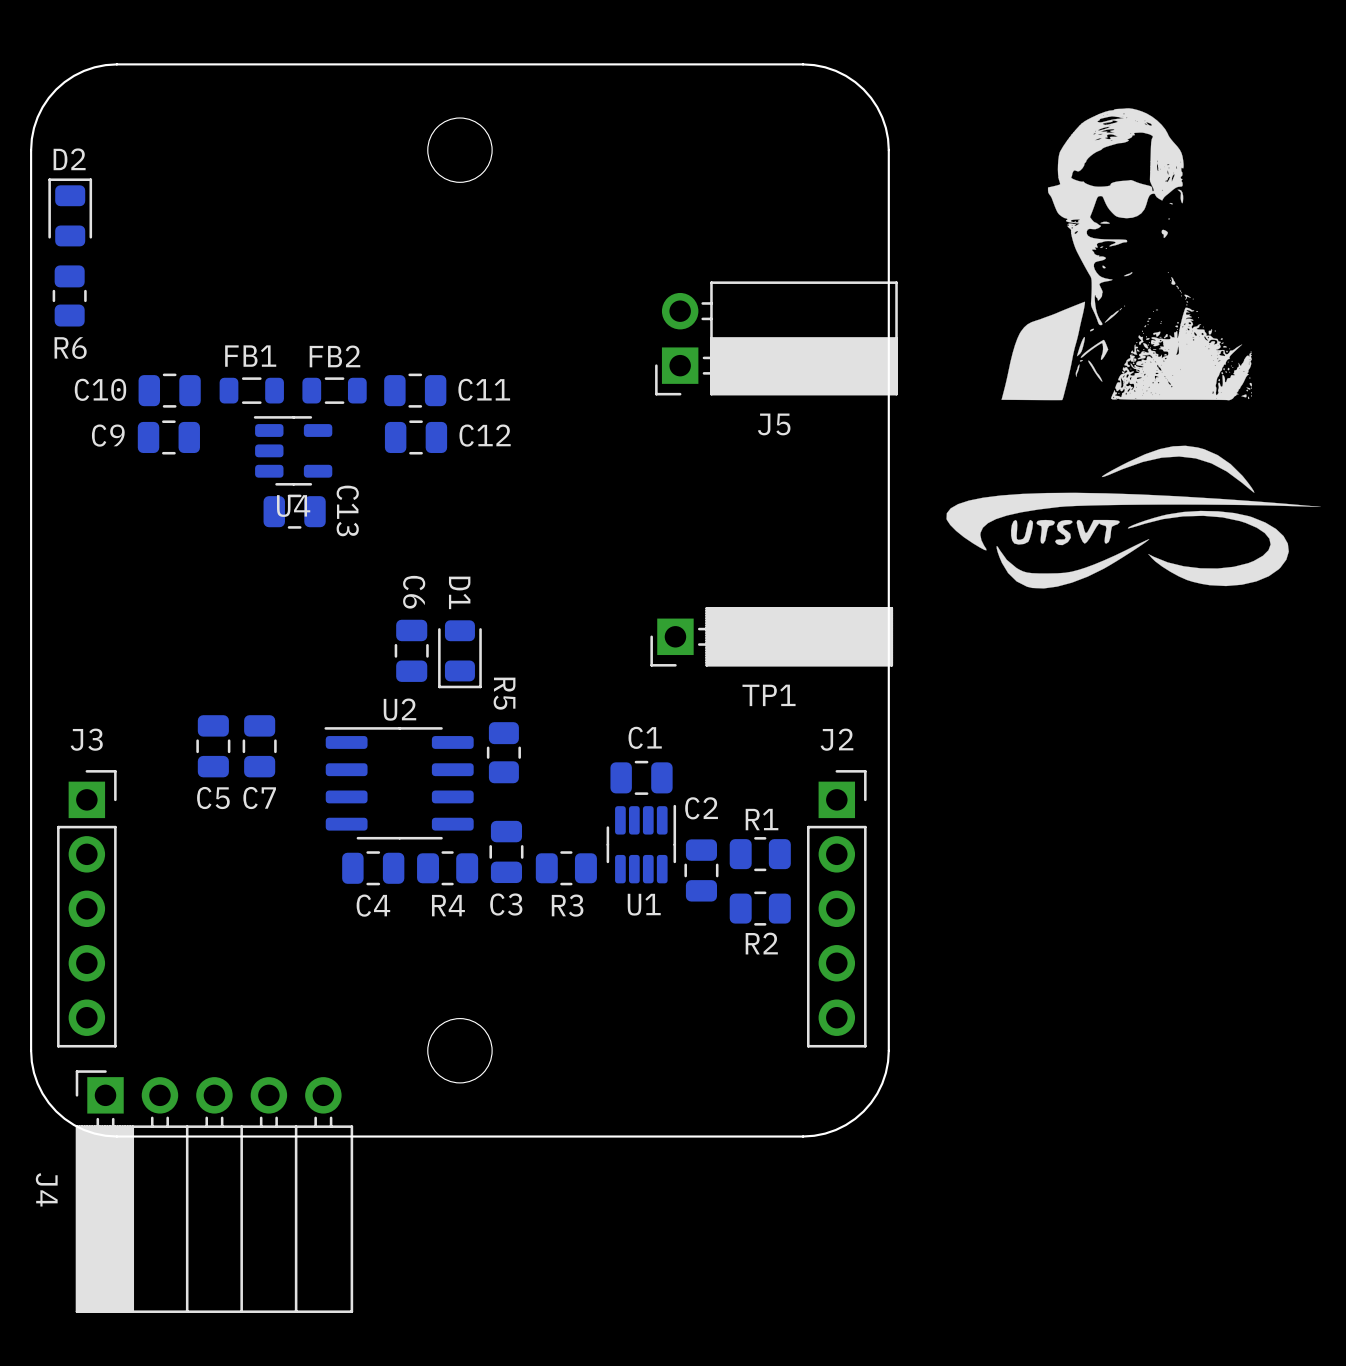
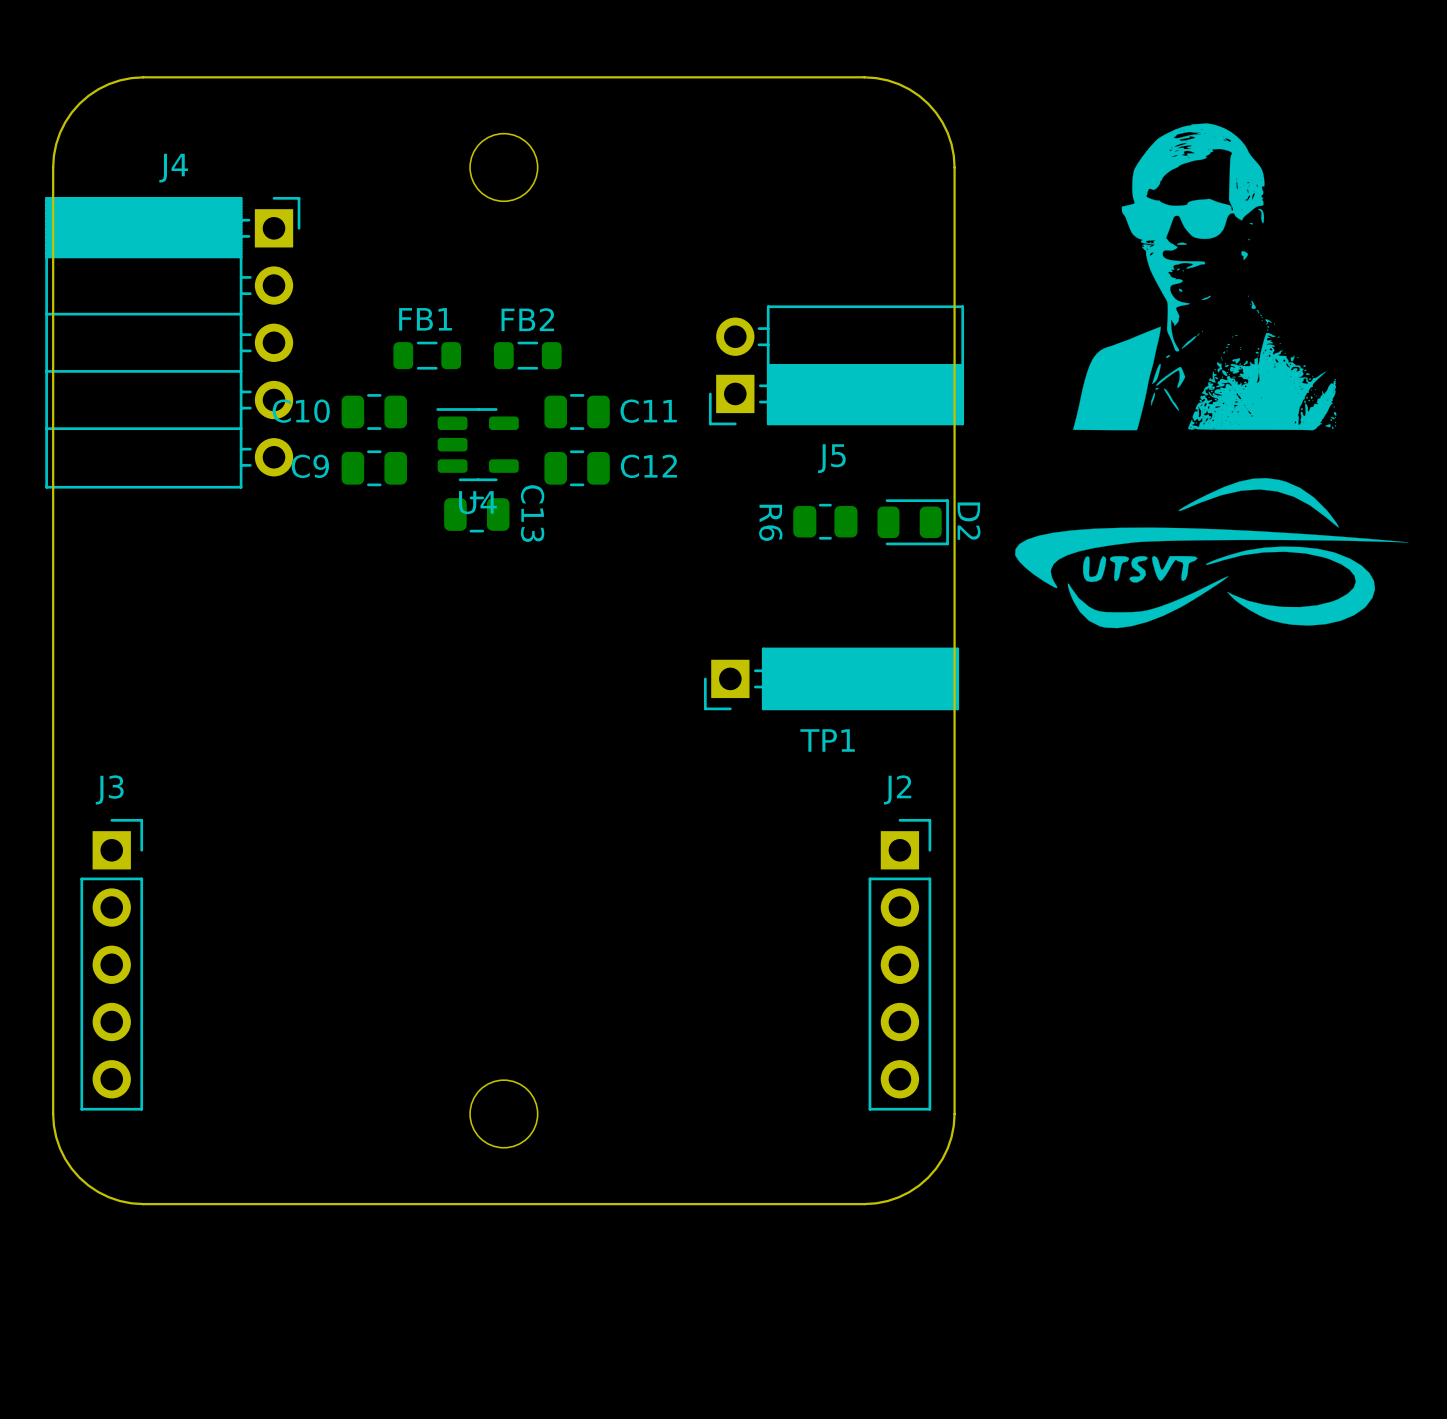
D2 rotation: 0° (70, 212) -> 90° clockwise (913, 522)
D2 position: (70, 212) -> (913, 522)
R6 rotation: 0° (69, 295) -> 90° clockwise (825, 521)
R6 position: (69, 295) -> (825, 521)
C10 position: (169, 390) -> (374, 411)
FB1 position: (251, 390) -> (427, 355)
FB2 position: (334, 390) -> (527, 355)
C11 position: (415, 390) -> (577, 411)
C9 position: (168, 437) -> (374, 468)
C12 position: (416, 437) -> (577, 468)
U4 position: (293, 450) -> (477, 444)
C13 position: (294, 511) -> (476, 514)
C6: (411, 650) -> none
D1: (459, 654) -> none
C5: (213, 746) -> none
C7: (259, 746) -> none
R5: (503, 752) -> none
C1: (641, 777) -> none
U2: (399, 783) -> none
U1: (641, 844) -> none
C3: (506, 851) -> none
R1: (760, 854) -> none
C4: (373, 868) -> none
R4: (447, 868) -> none
R3: (566, 868) -> none
C2: (701, 870) -> none
R2: (760, 908) -> none
J4 rotation: 0° (214, 1191) -> 90° clockwise (172, 342)
J4 position: (214, 1191) -> (172, 342)

